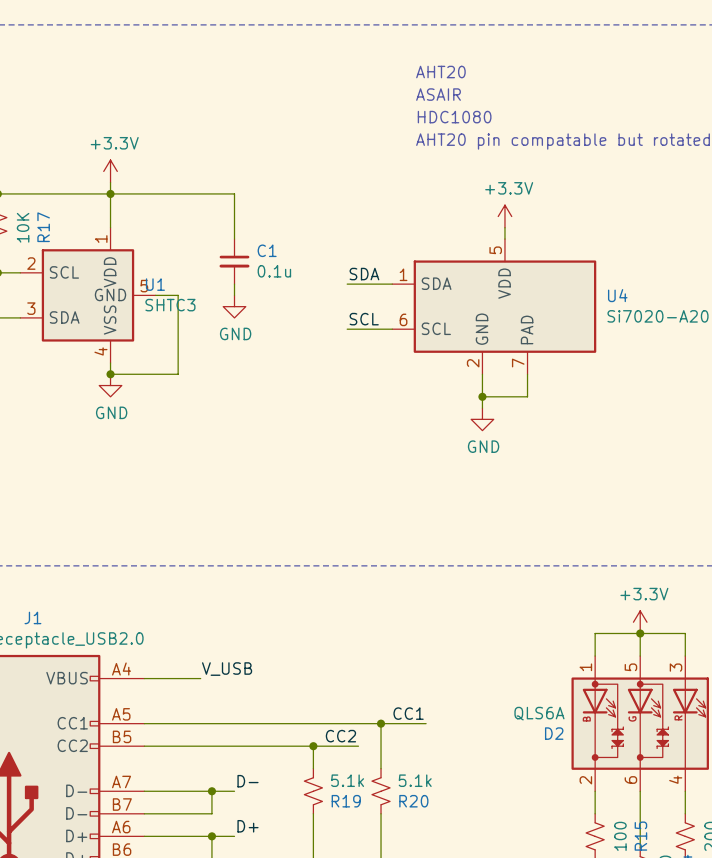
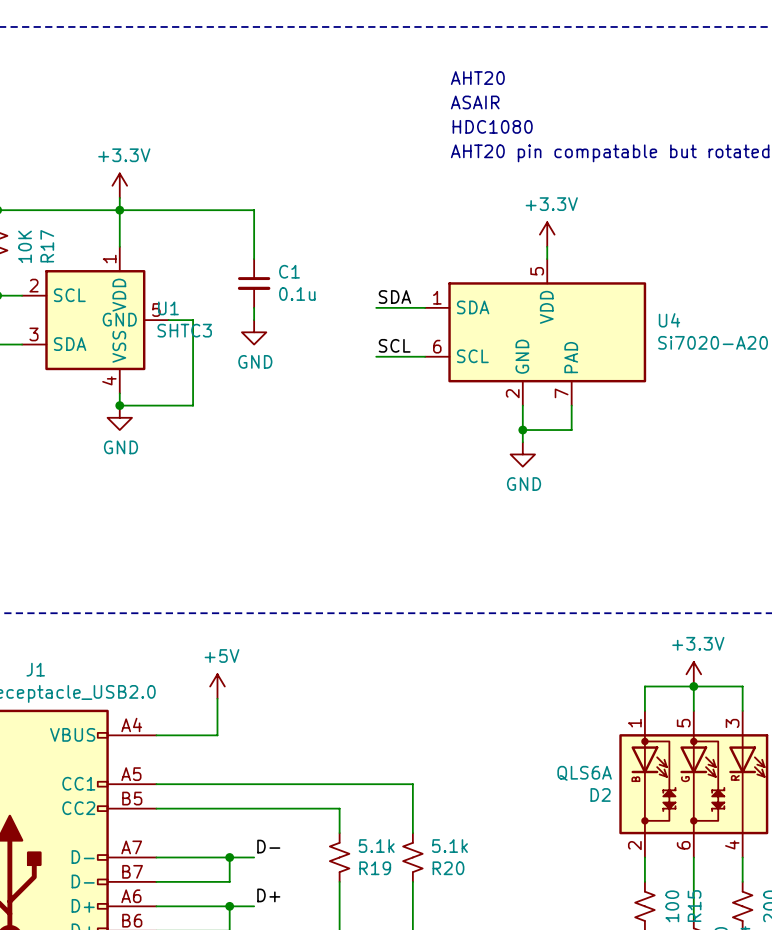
power symbol: none -> +5V (217, 686)
wire: none -> (217, 698) (217, 735)
label: V_USB (227, 669) -> none
label: CC1 (408, 713) -> none
wire: (381, 723) (426, 723) -> none
junction: (381, 723) -> none
label: CC2 (340, 736) -> none
wire: (313, 746) (358, 746) -> none
junction: (313, 746) -> none

